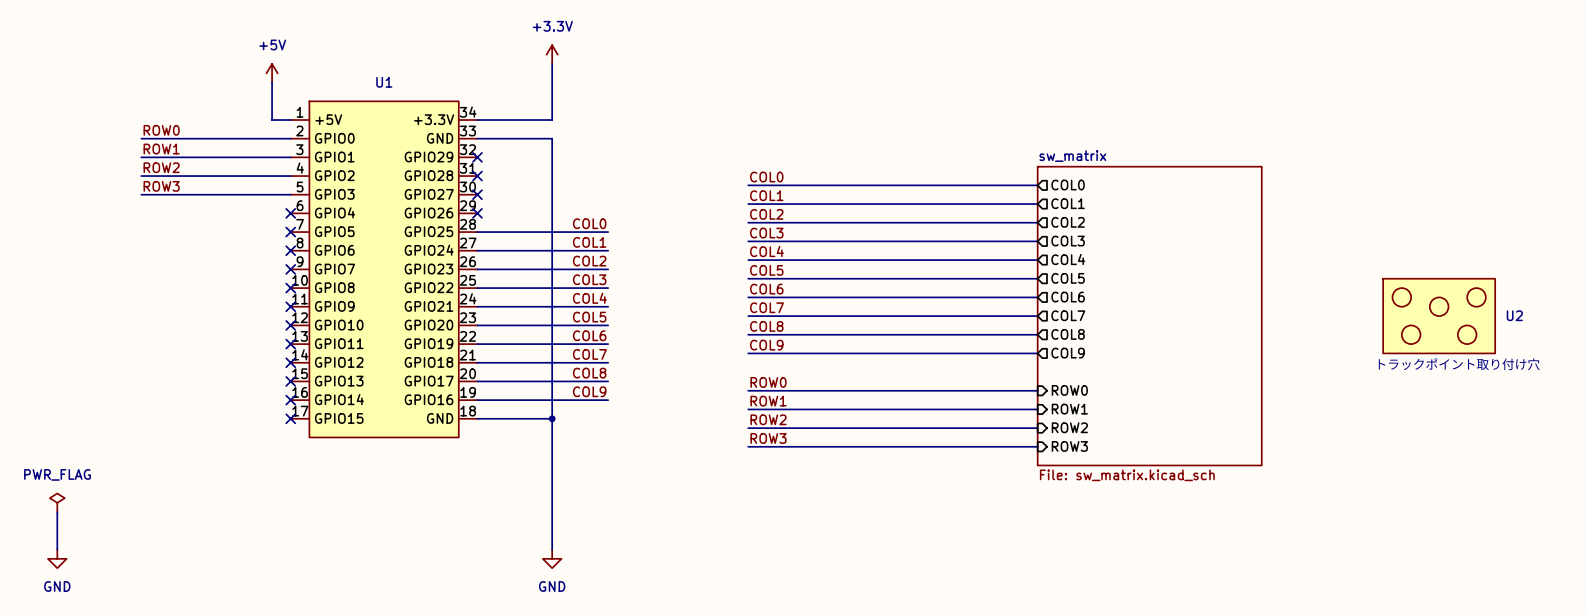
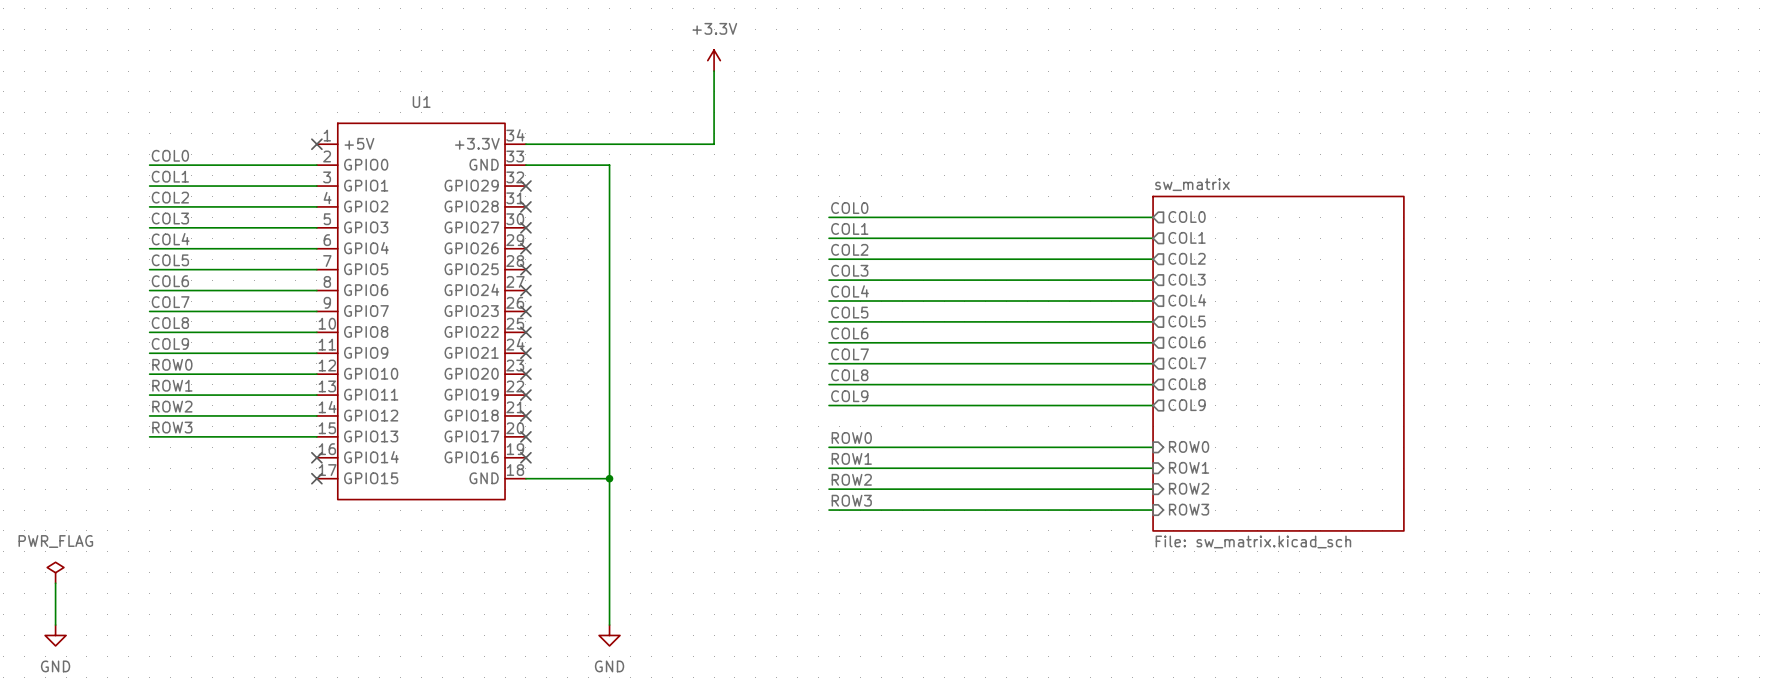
power symbol position: +3.3V (552, 54) -> +3.3V (714, 60)
wire: (552, 63) (552, 120) -> (714, 71) (714, 144) (609, 144)
power symbol: +5V (272, 73) -> none
wire: (272, 82) (272, 120) (290, 120) -> none
no-connect mark: none -> (316, 144)
label: ROW0 (161, 130) -> COL0 (170, 155)
label: ROW1 (161, 149) -> COL1 (170, 176)
label: ROW2 (161, 167) -> COL2 (170, 197)
label: ROW3 (161, 186) -> COL3 (170, 218)
label: none -> COL4 (170, 239)
wire: none -> (149, 248) (316, 248)
no-connect mark: (290, 213) -> none
label: none -> COL5 (170, 260)
label: COL0 (589, 223) -> none
wire: none -> (149, 269) (316, 269)
no-connect mark: (290, 232) -> none
wire: (477, 232) (608, 232) -> none
no-connect mark: none -> (525, 269)
label: none -> COL6 (170, 281)
label: COL1 (589, 242) -> none
wire: none -> (149, 290) (316, 290)
no-connect mark: (290, 250) -> none
wire: (477, 250) (608, 250) -> none
no-connect mark: none -> (525, 290)
label: none -> COL7 (170, 302)
label: COL2 (589, 261) -> none
wire: none -> (149, 311) (316, 311)
no-connect mark: (290, 269) -> none
wire: (477, 269) (608, 269) -> none
no-connect mark: none -> (525, 311)
label: none -> COL8 (170, 323)
label: COL3 (589, 279) -> none
wire: none -> (149, 332) (316, 332)
no-connect mark: (290, 288) -> none
wire: (477, 288) (608, 288) -> none
no-connect mark: none -> (525, 332)
label: none -> COL9 (170, 343)
label: COL4 (589, 298) -> none
wire: none -> (149, 353) (316, 353)
no-connect mark: (290, 306) -> none
wire: (477, 306) (608, 306) -> none
no-connect mark: none -> (525, 353)
U2: (1439, 316) -> none
label: none -> ROW0 (172, 364)
label: COL5 (589, 317) -> none
wire: none -> (149, 374) (316, 374)
no-connect mark: (290, 325) -> none
wire: (477, 325) (608, 325) -> none
no-connect mark: none -> (525, 374)
label: none -> ROW1 (172, 385)
label: COL6 (589, 335) -> none
wire: none -> (149, 395) (316, 395)
no-connect mark: (290, 344) -> none
wire: (477, 344) (608, 344) -> none
no-connect mark: none -> (525, 395)
label: none -> ROW2 (172, 406)
label: COL7 (589, 354) -> none
wire: none -> (149, 415) (316, 415)
no-connect mark: (290, 362) -> none
wire: (477, 362) (608, 362) -> none
no-connect mark: none -> (525, 415)
text: トラックポイント取り付け穴 (1459, 364) -> none
label: none -> ROW3 (172, 427)
label: COL8 (589, 373) -> none
wire: none -> (149, 436) (316, 436)
no-connect mark: (290, 381) -> none
wire: (477, 381) (608, 381) -> none
no-connect mark: none -> (525, 436)
label: COL9 (589, 391) -> none
wire: (477, 400) (608, 400) -> none
no-connect mark: none -> (525, 457)

